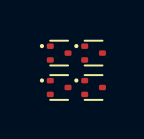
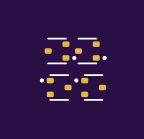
part rotation: 0° (55, 53) -> 180° (60, 51)
part rotation: 0° (90, 53) -> 180° (90, 51)

